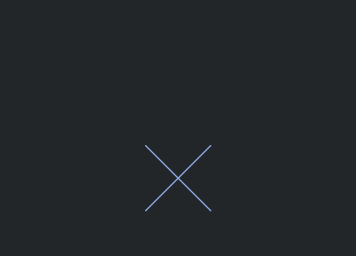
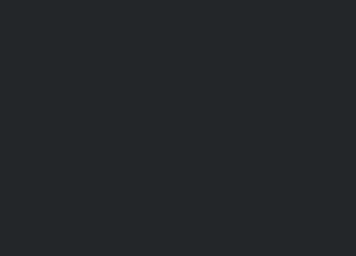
no-connect mark: (178, 178) -> none

